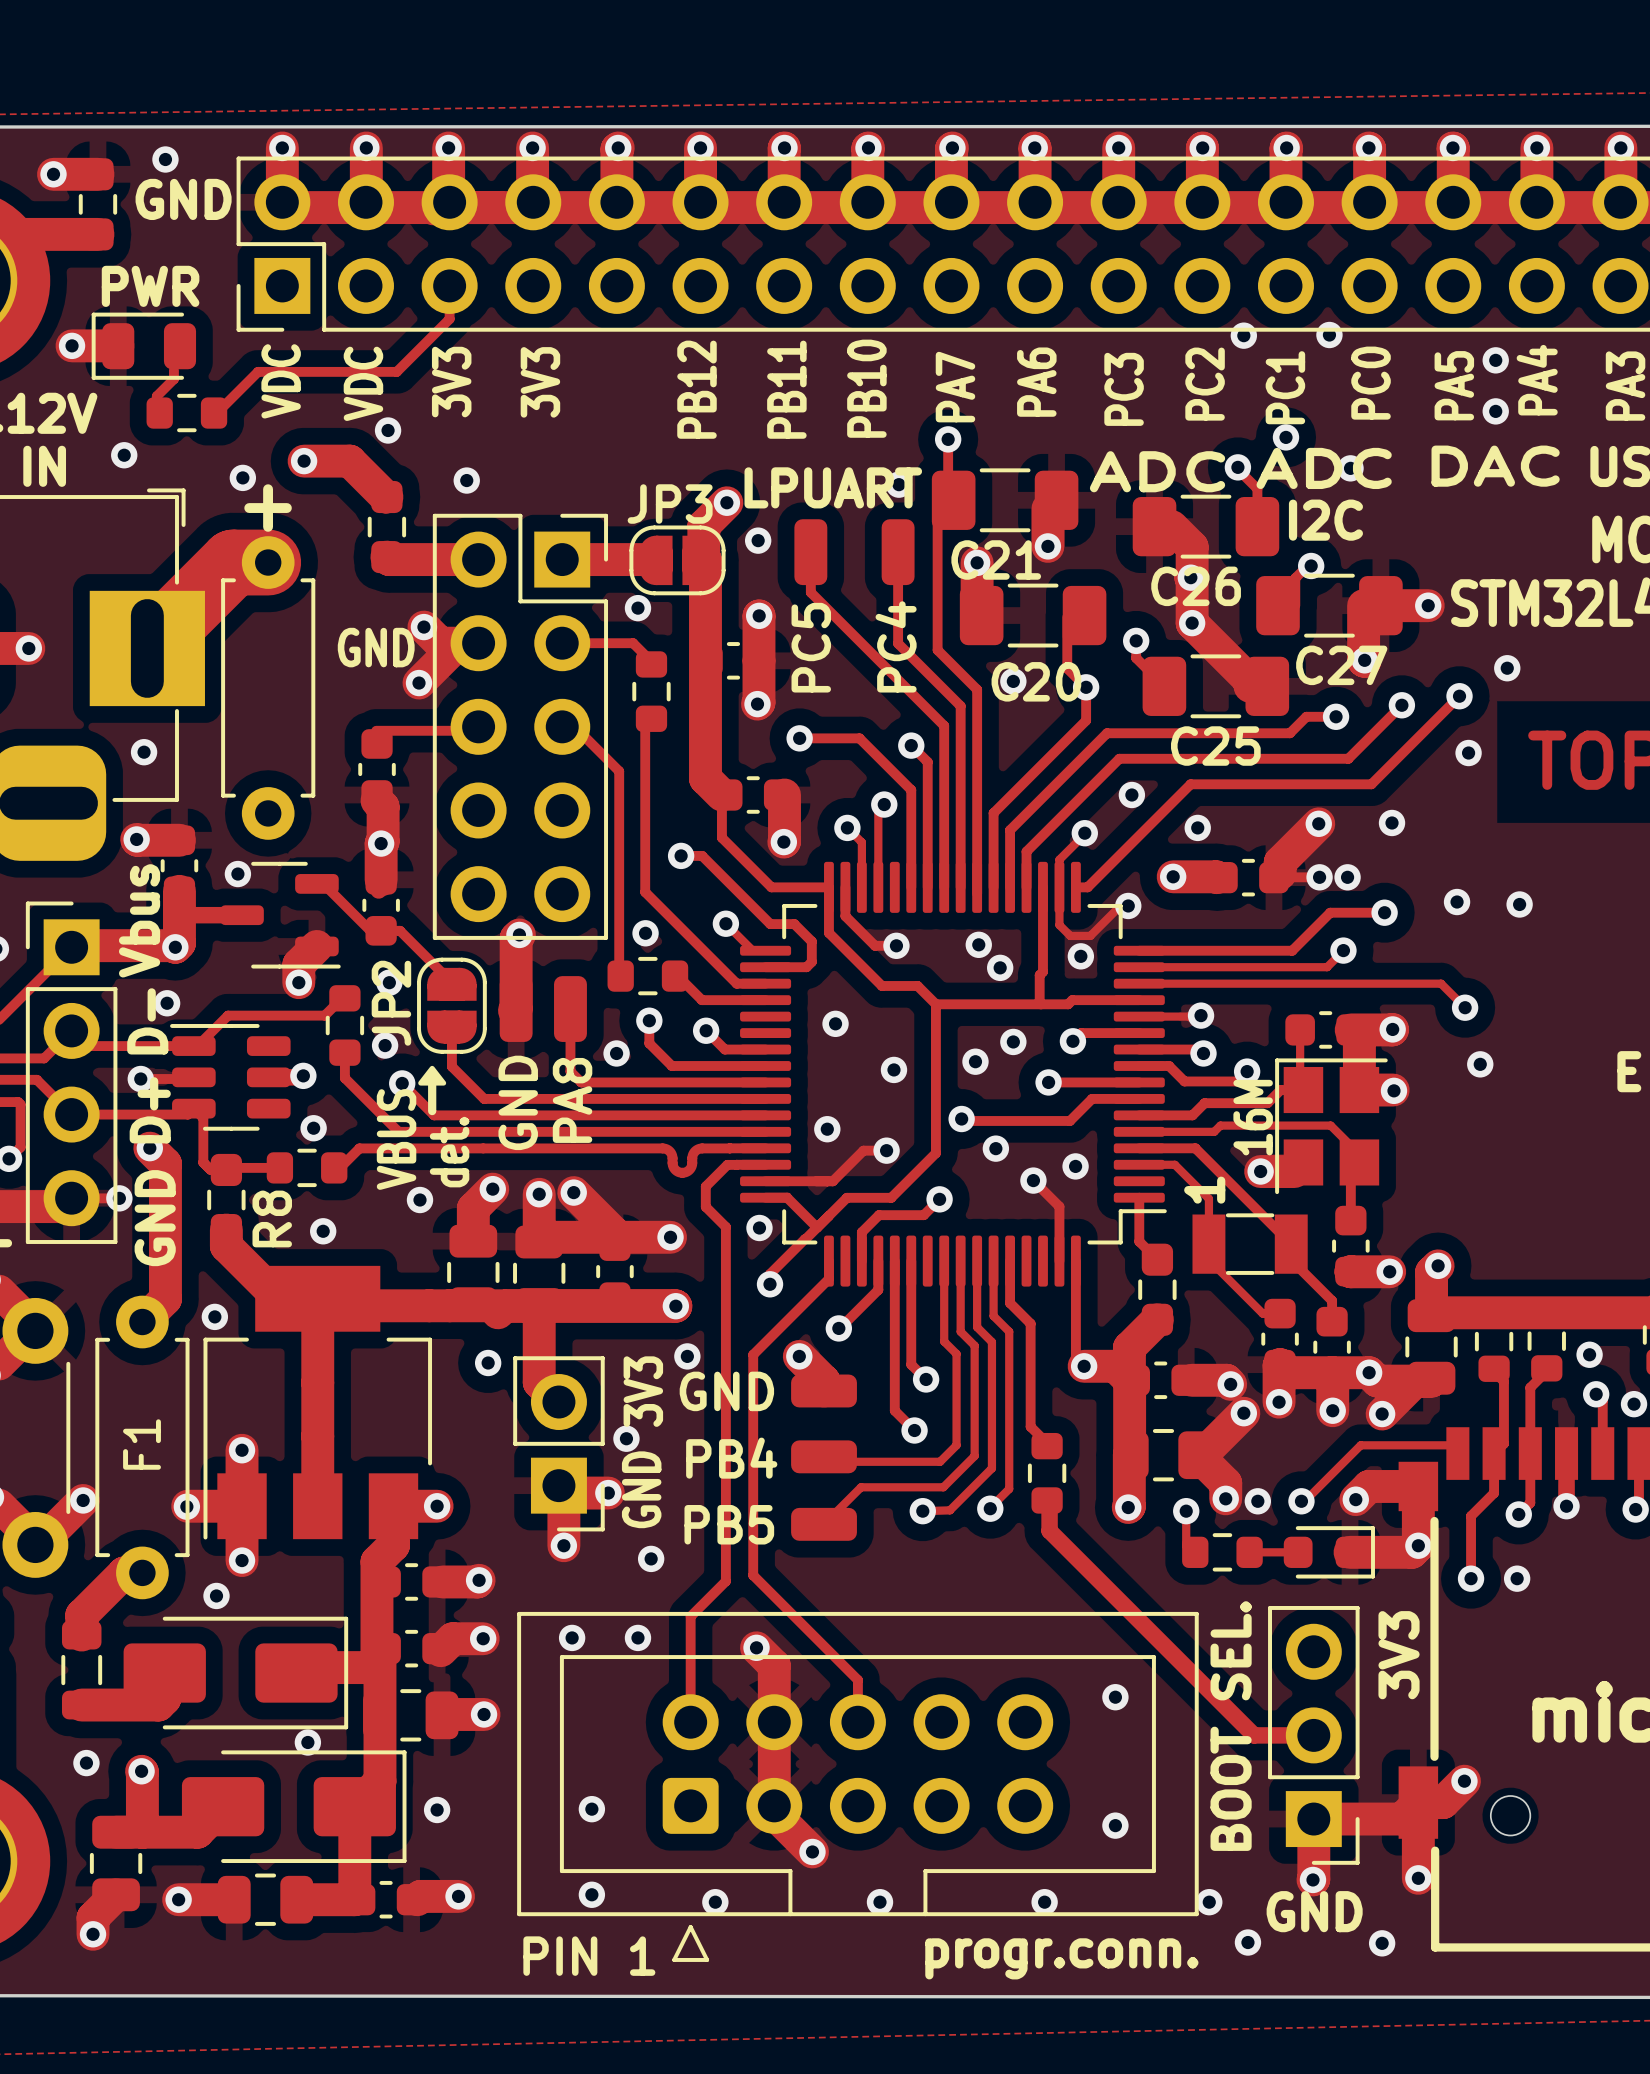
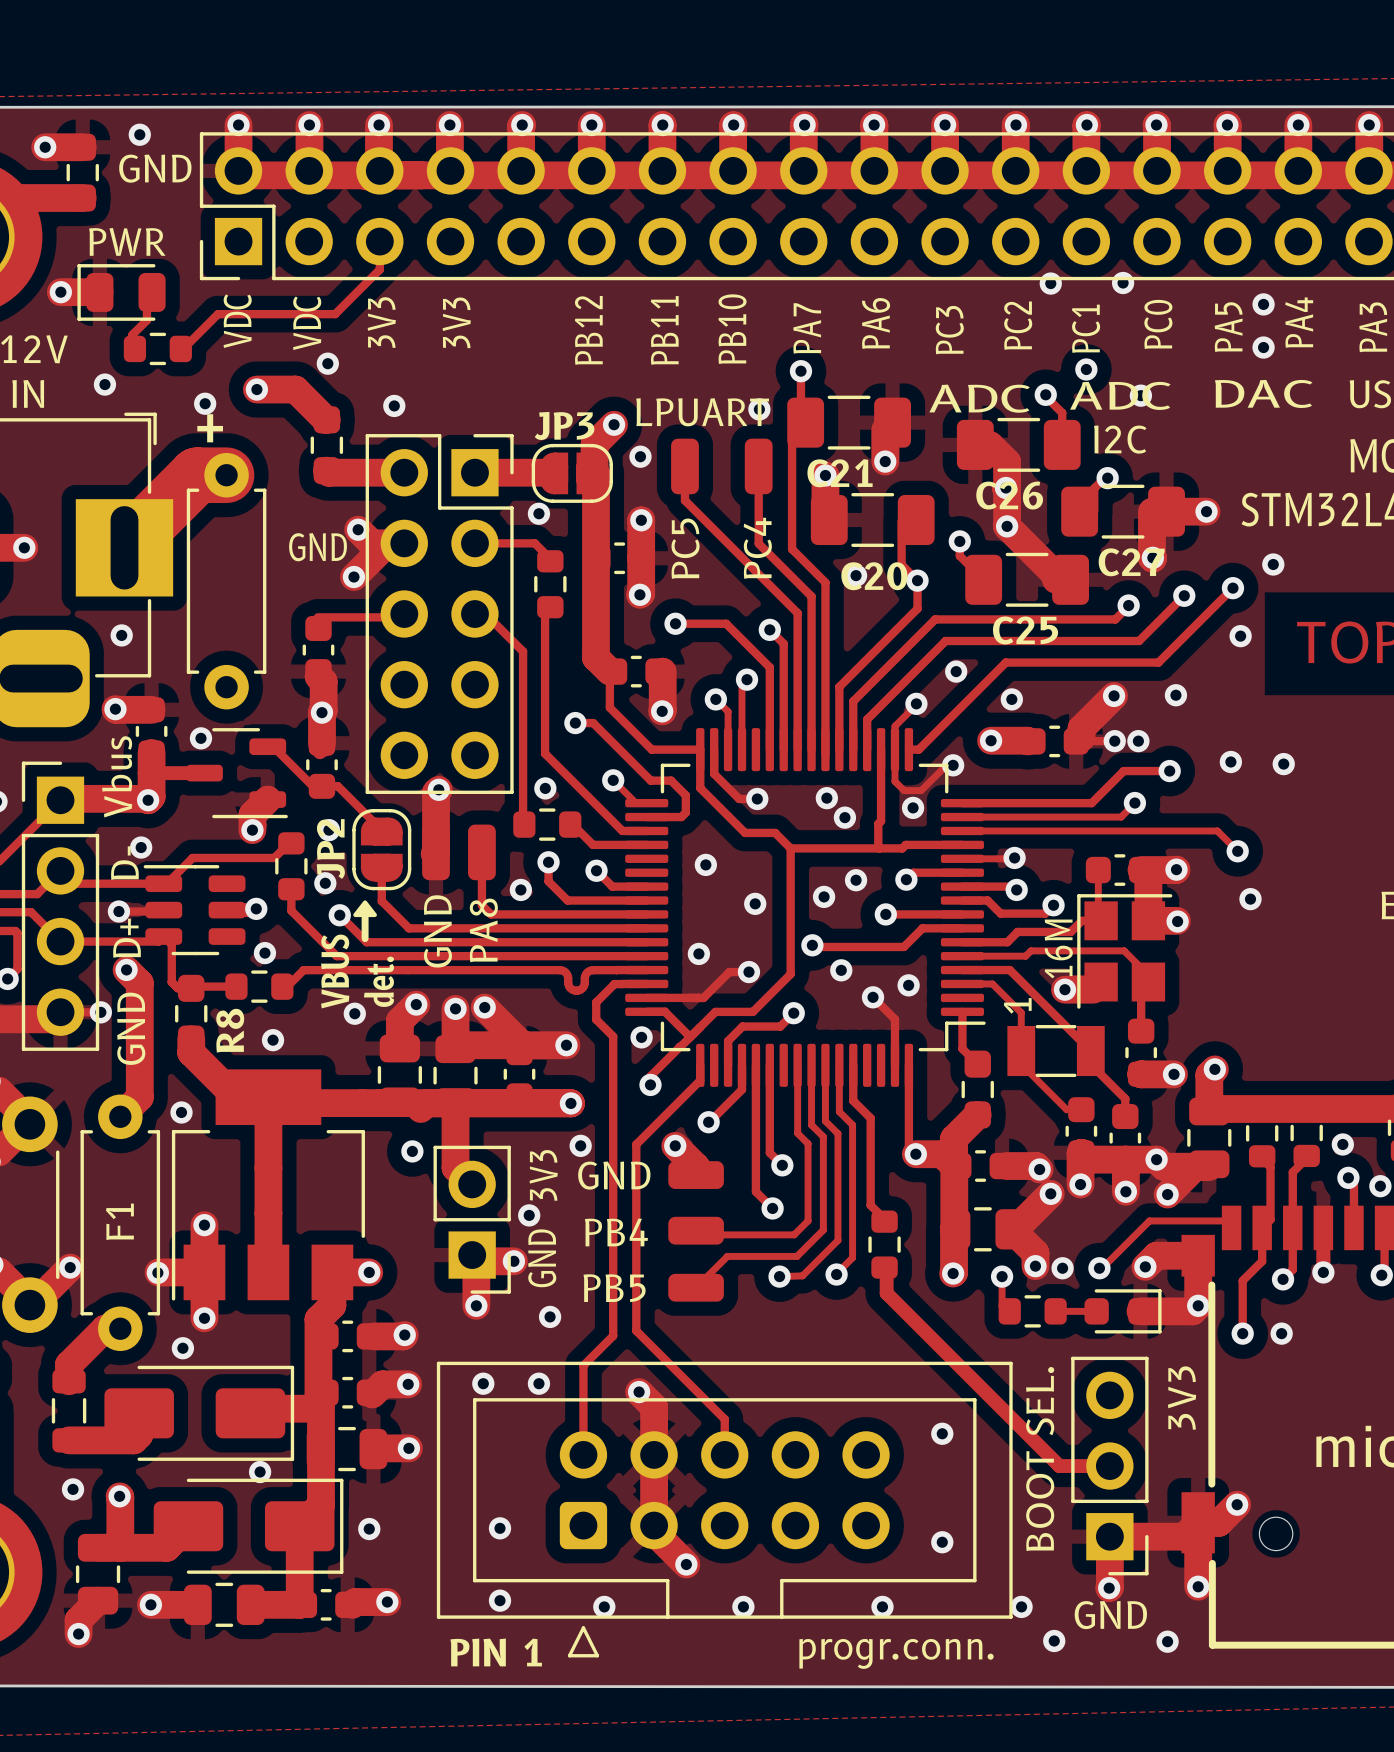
track: (1336, 716) (1306, 716) (1289, 733) -> (1128, 605) (1115, 619) (1089, 619)

